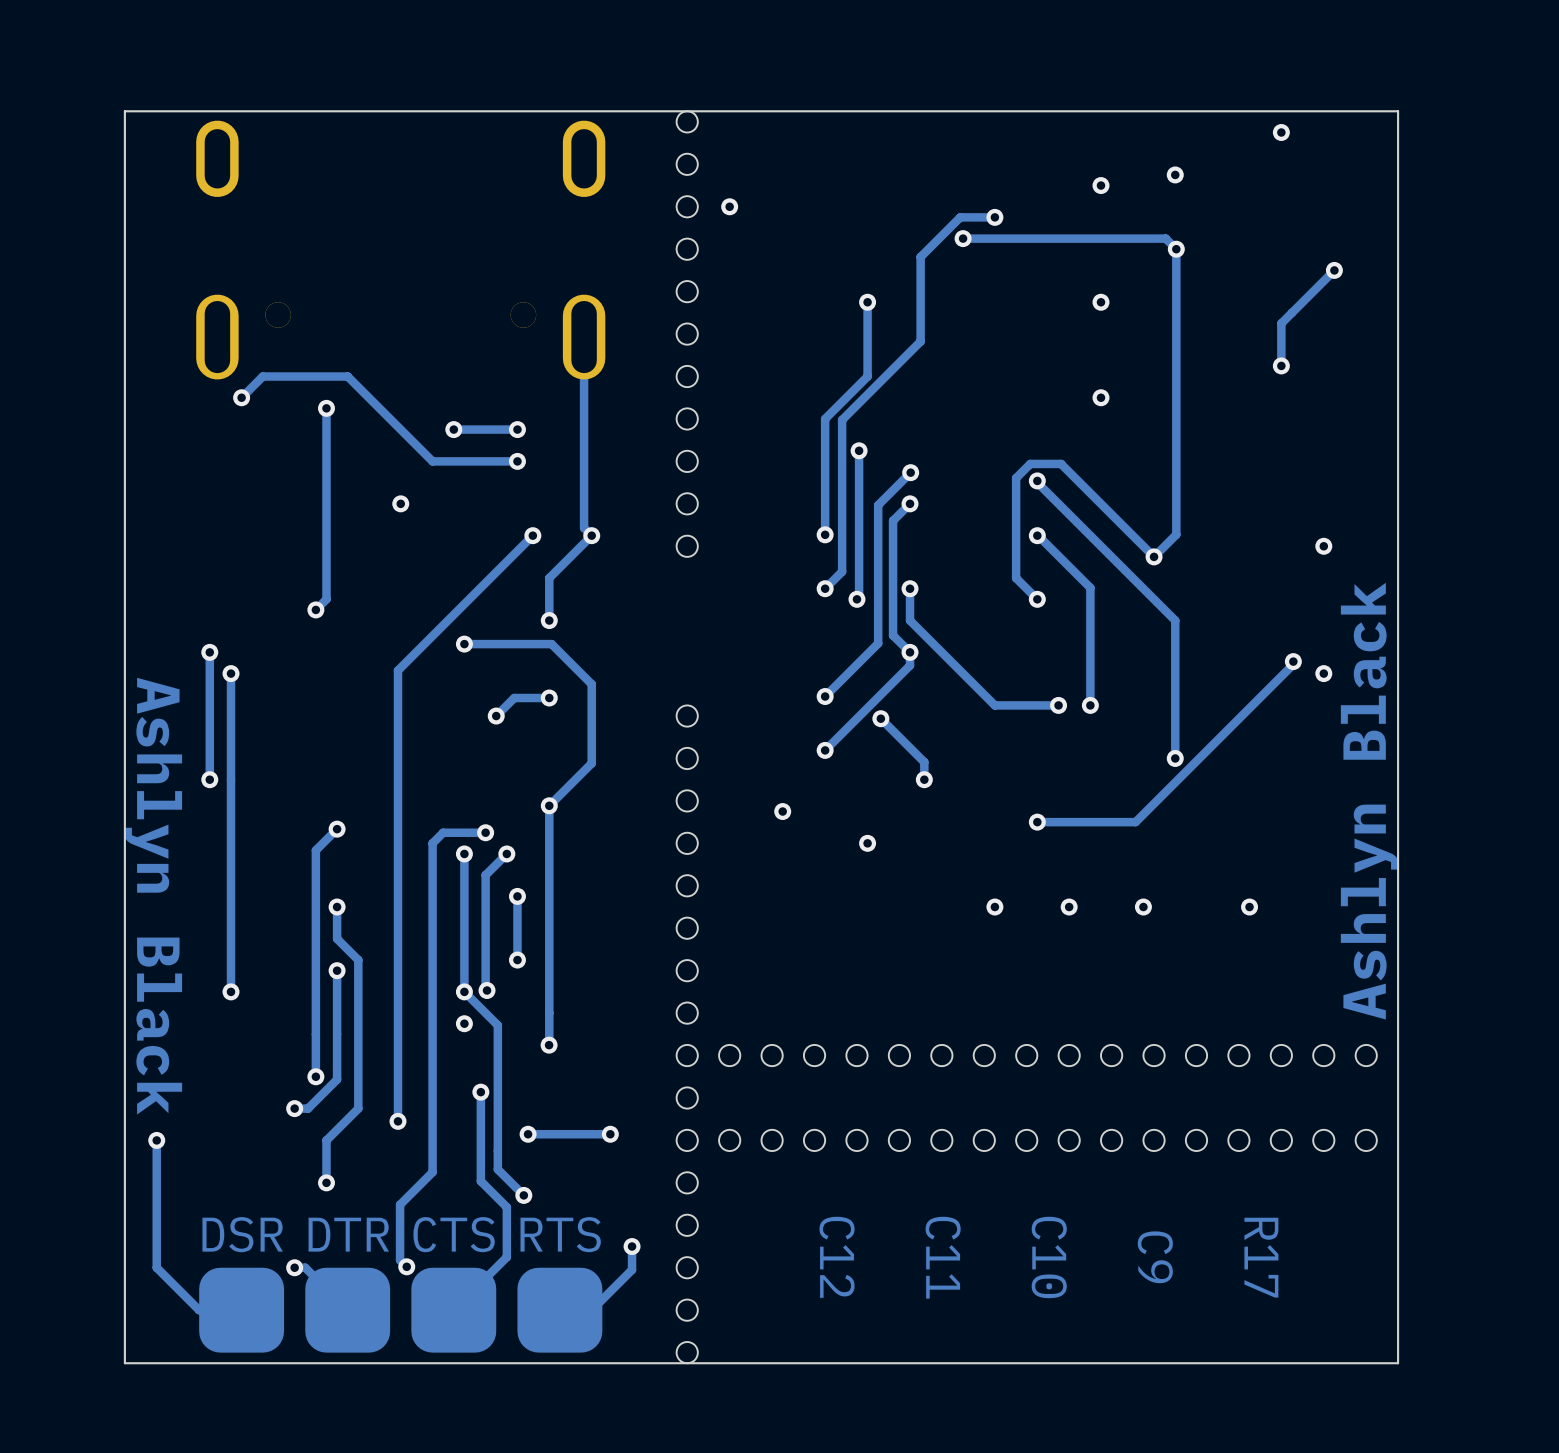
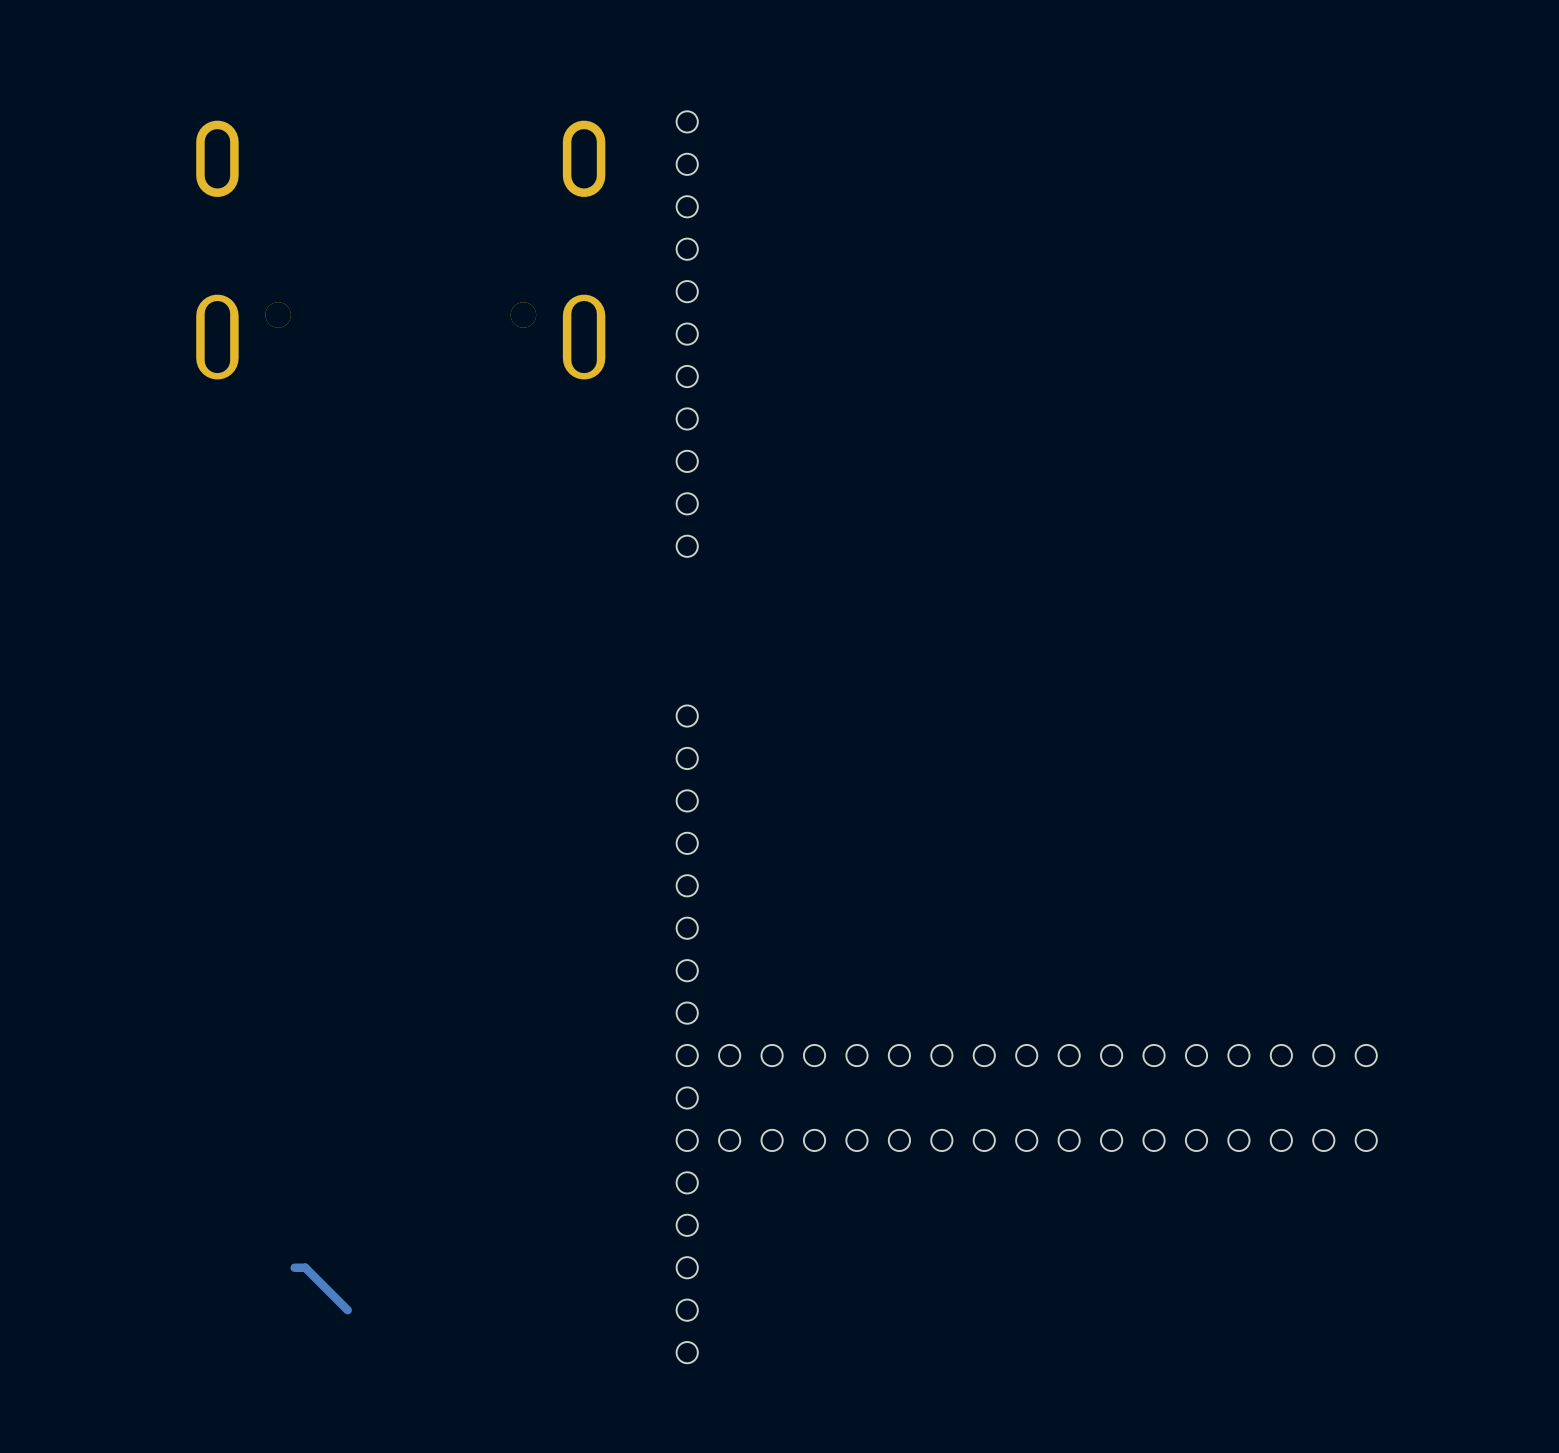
board edge: (1398, 111) (1398, 1363) (124, 1363) (124, 111) (1398, 111) -> none
via: (1281, 132) -> none
via: (1175, 174) -> none
via: (1101, 185) -> none
via: (729, 206) -> none
track: (994, 217) (960, 217) (920, 257) (920, 341) (842, 419) (842, 571) (825, 588) -> none
via: (994, 217) -> none
track: (963, 238) (1165, 238) (1176, 249) (1176, 534) (1154, 556) (1061, 463) (1030, 463) (1016, 478) (1016, 578) (1037, 599) -> none
via: (963, 238) -> none
via: (1176, 249) -> none
track: (1334, 270) (1281, 323) (1281, 365) -> none
via: (1334, 270) -> none
track: (867, 302) (867, 376) (825, 418) (825, 534) -> none
via: (867, 302) -> none
via: (1101, 302) -> none
track: (584, 337) (584, 528) (591, 535) (549, 578) (549, 620) -> none
via: (1281, 365) -> none
track: (241, 397) (262, 376) (347, 376) (432, 461) (517, 461) -> none
via: (241, 397) -> none
via: (1101, 397) -> none
track: (326, 408) (326, 599) (315, 609) -> none
via: (326, 408) -> none
via: (453, 429) -> none
track: (517, 429) (453, 429) -> none
via: (517, 429) -> none
track: (859, 448) (859, 597) (856, 599) -> none
via: (859, 450) -> none
via: (517, 461) -> none
track: (910, 472) (878, 505) (878, 643) (825, 696) -> none
via: (910, 472) -> none
track: (1037, 480) (1175, 620) (1175, 758) -> none
via: (1037, 480) -> none
via: (400, 503) -> none
track: (910, 503) (893, 520) (893, 635) (910, 652) (910, 665) (825, 750) -> none
via: (910, 503) -> none
via: (825, 534) -> none
track: (1036, 534) (1090, 587) (1090, 705) -> none
track: (532, 535) (398, 670) (398, 1121) -> none
via: (532, 535) -> none
via: (591, 535) -> none
via: (1037, 535) -> none
via: (1323, 546) -> none
via: (1154, 556) -> none
via: (825, 588) -> none
track: (910, 588) (910, 620) (994, 705) (1058, 705) -> none
via: (910, 588) -> none
via: (856, 599) -> none
via: (1037, 599) -> none
via: (315, 609) -> none
via: (549, 620) -> none
track: (464, 644) (551, 644) (591, 684) (591, 763) (549, 805) (549, 1044) -> none
via: (464, 644) -> none
track: (209, 652) (209, 779) -> none
via: (209, 652) -> none
via: (910, 652) -> none
track: (1293, 661) (1293, 664) (1135, 822) (1037, 822) -> none
via: (1293, 661) -> none
track: (231, 673) (231, 991) -> none
via: (231, 673) -> none
via: (1323, 673) -> none
via: (825, 696) -> none
track: (549, 698) (514, 698) (496, 716) -> none
via: (549, 698) -> none
via: (1058, 705) -> none
via: (1090, 705) -> none
via: (496, 716) -> none
track: (880, 718) (924, 762) (924, 779) -> none
via: (880, 718) -> none
via: (825, 750) -> none
via: (1175, 758) -> none
via: (209, 779) -> none
via: (924, 779) -> none
text: Ashlyn Black (1369, 801) -> none
via: (549, 805) -> none
via: (782, 811) -> none
via: (1037, 822) -> none
track: (337, 829) (315, 850) (315, 1076) -> none
via: (337, 829) -> none
track: (485, 832) (443, 832) (432, 843) (432, 1172) (400, 1204) (400, 1260) (406, 1266) -> none
via: (485, 832) -> none
via: (867, 843) -> none
track: (464, 853) (464, 991) (497, 1025) (497, 1169) (523, 1195) -> none
via: (464, 853) -> none
track: (506, 853) (485, 875) (487, 990) -> none
via: (506, 853) -> none
text: Ashlyn Black (153, 896) -> none
track: (517, 896) (517, 960) -> none
via: (517, 896) -> none
track: (337, 907) (337, 938) (358, 960) (358, 1108) (326, 1140) (326, 1182) -> none
via: (337, 907) -> none
via: (994, 907) -> none
via: (1069, 907) -> none
via: (1143, 907) -> none
via: (1249, 907) -> none
via: (517, 960) -> none
track: (337, 970) (337, 1079) (308, 1108) (294, 1108) -> none
via: (337, 970) -> none
via: (487, 990) -> none
via: (231, 991) -> none
via: (464, 991) -> none
via: (464, 1023) -> none
via: (549, 1045) -> none
via: (315, 1076) -> none
track: (480, 1092) (480, 1181) (506, 1207) (506, 1257) (453, 1310) -> none
via: (480, 1092) -> none
via: (294, 1108) -> none
via: (398, 1121) -> none
via: (528, 1134) -> none
track: (610, 1134) (528, 1134) -> none
via: (610, 1134) -> none
track: (156, 1140) (156, 1267) (199, 1310) (241, 1310) -> none
via: (156, 1140) -> none
via: (326, 1182) -> none
via: (523, 1195) -> none
text: DSR (242, 1234) -> none
text: DTR (348, 1234) -> none
text: CTS (454, 1234) -> none
text: RTS (560, 1234) -> none
track: (632, 1246) (632, 1269) (591, 1310) (559, 1310) -> none
via: (632, 1246) -> none
C12: (837, 1257) -> none
C11: (943, 1257) -> none
C10: (1049, 1257) -> none
C9: (1155, 1257) -> none
R17: (1261, 1257) -> none
via: (406, 1266) -> none
via: (294, 1267) -> none
part: (400, 1310) -> none

